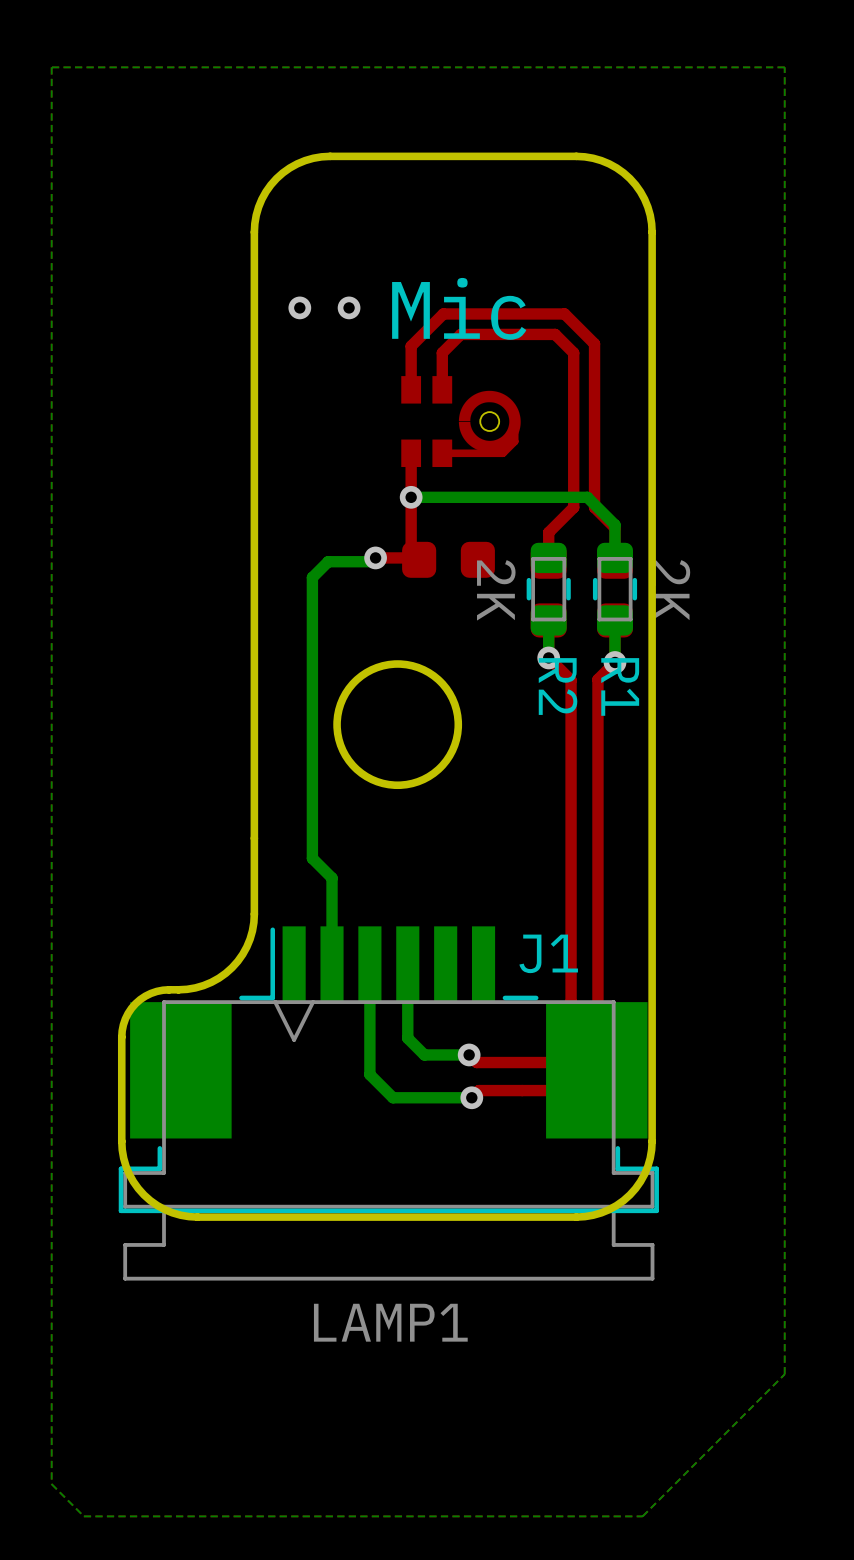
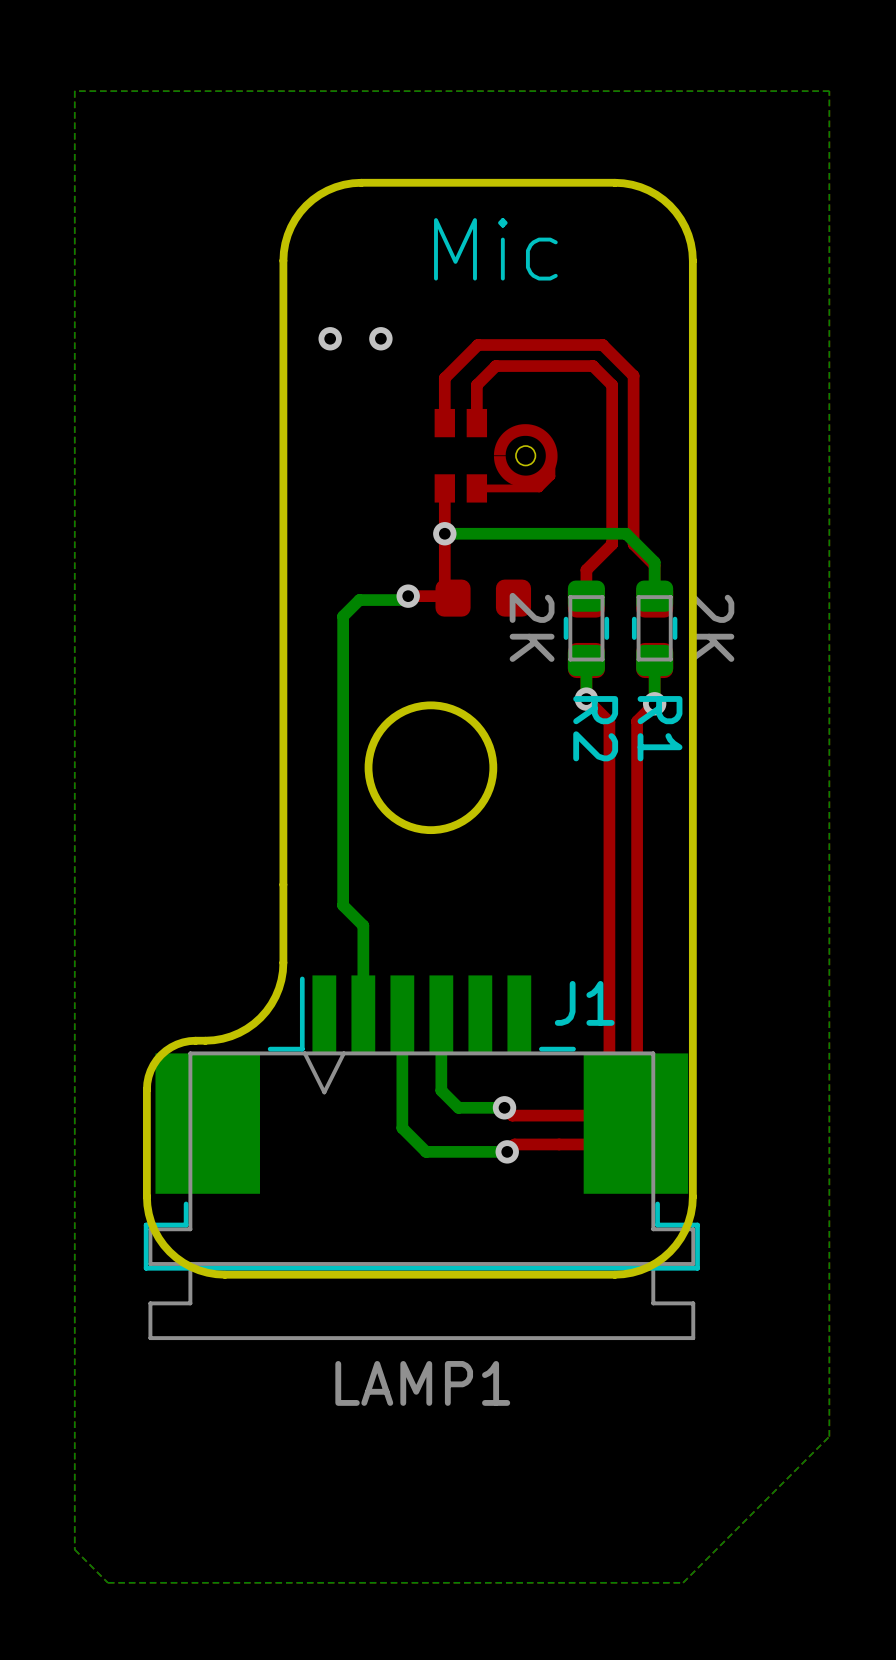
text position: Mic (459, 308) -> Mic (495, 249)

